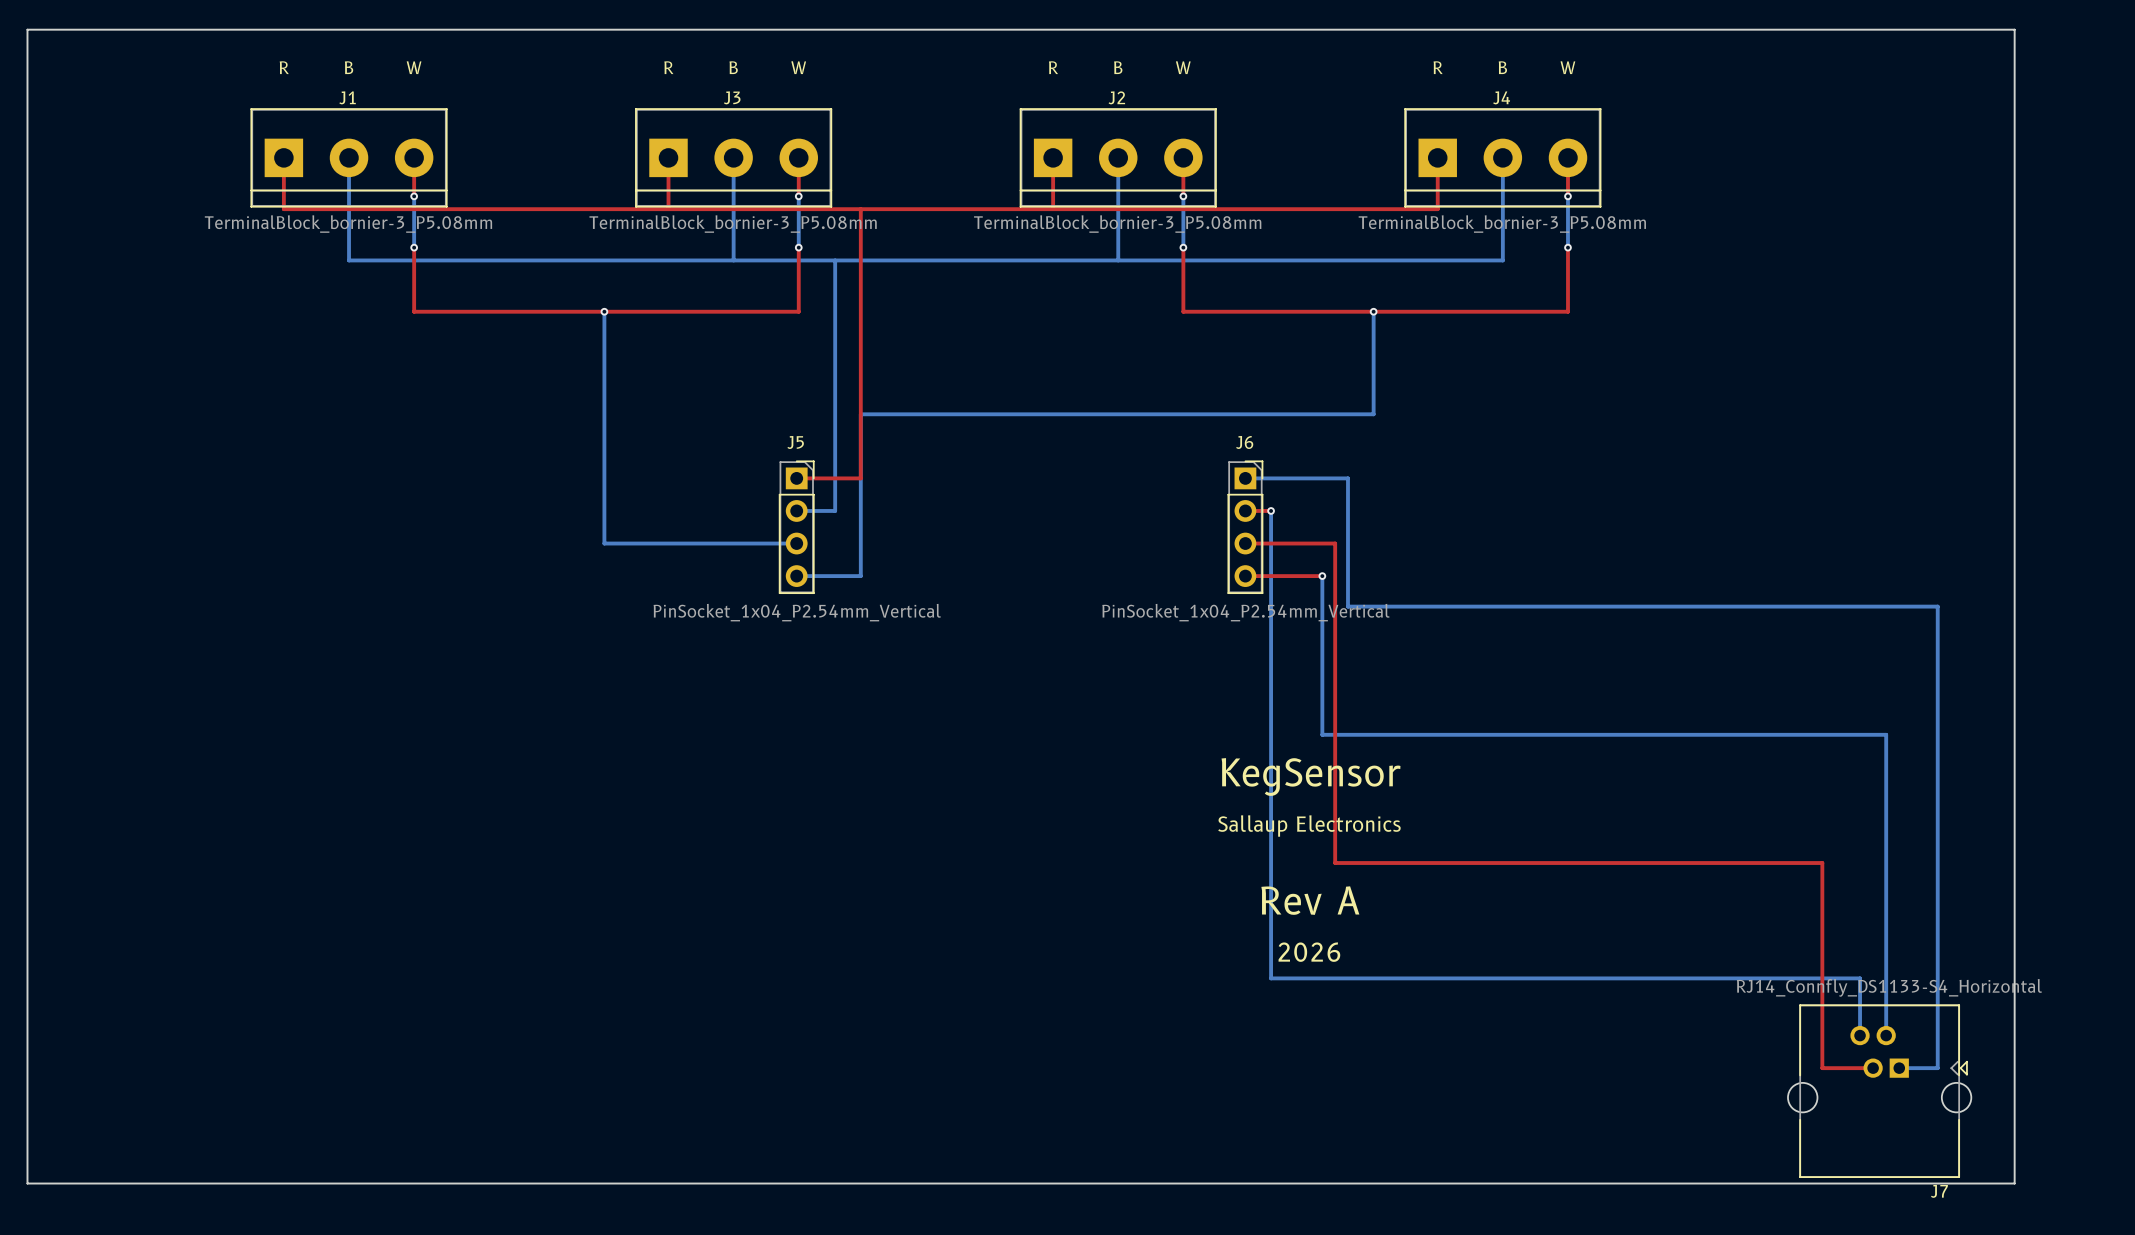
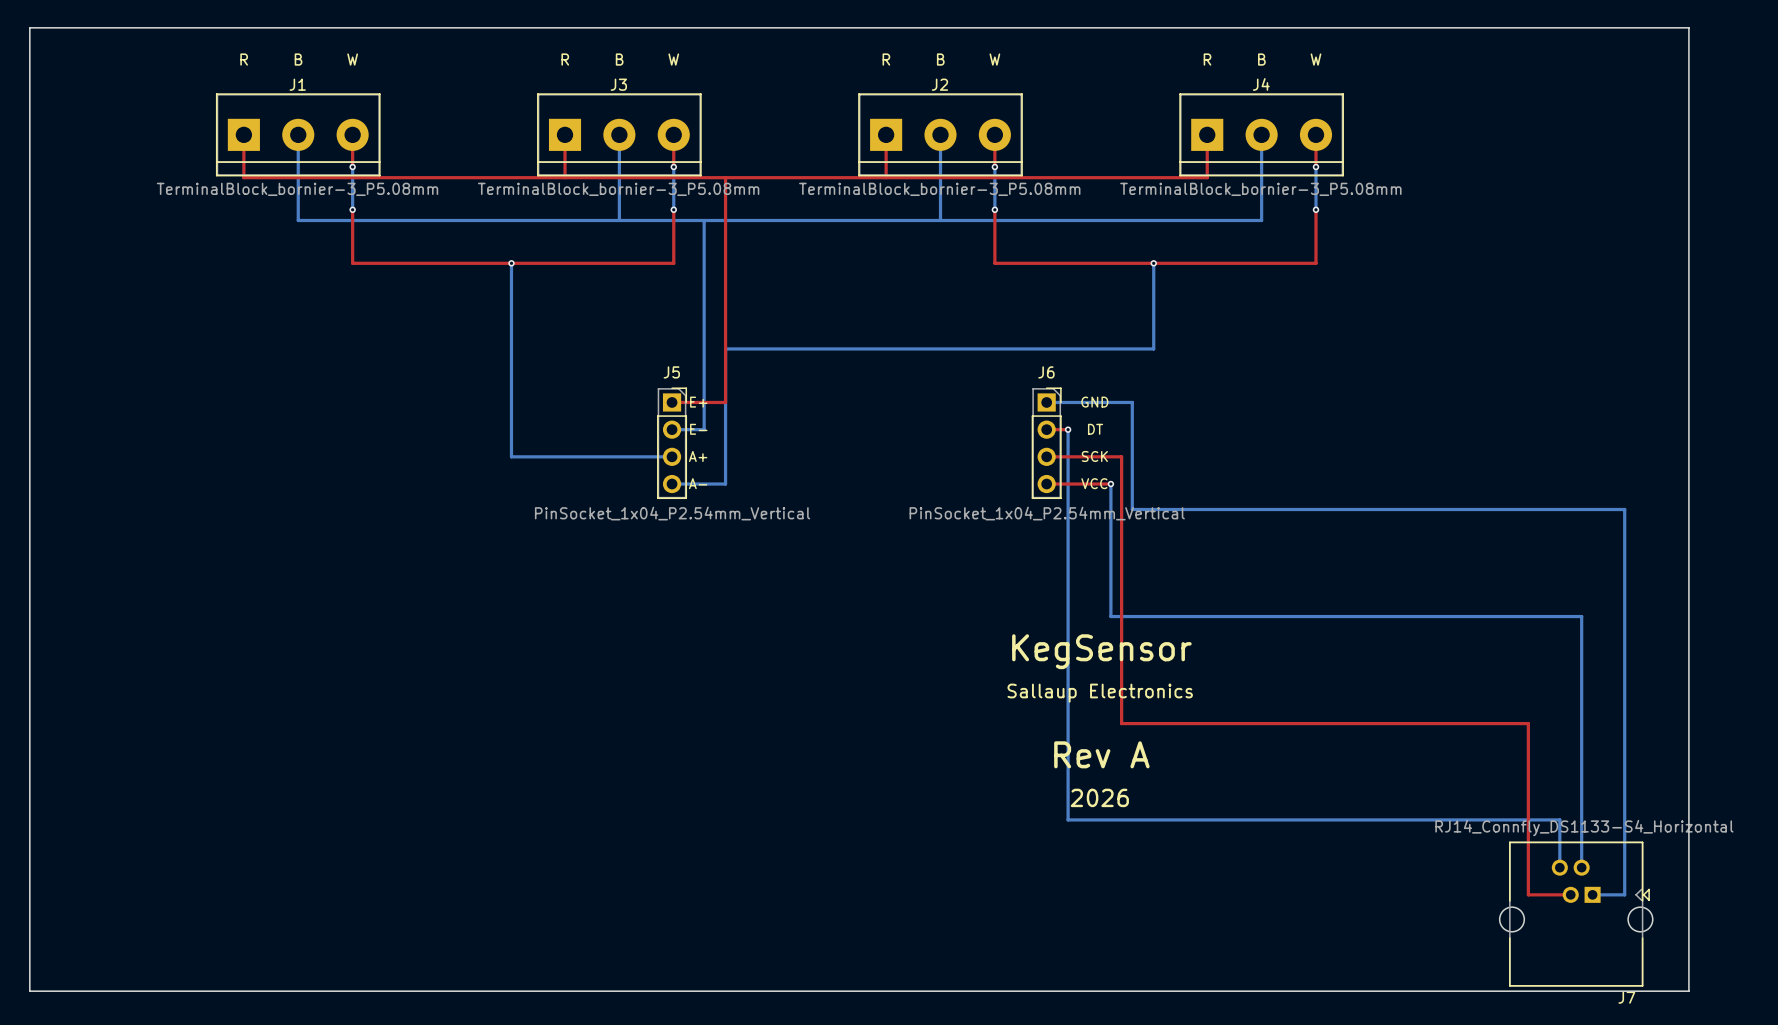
text: none -> E+ (698, 402)
text: none -> GND (1094, 402)
text: none -> E- (698, 429)
text: none -> DT (1095, 429)
text: none -> A+ (698, 456)
text: none -> SCK (1094, 456)
text: none -> A- (698, 483)
text: none -> VCC (1094, 483)

